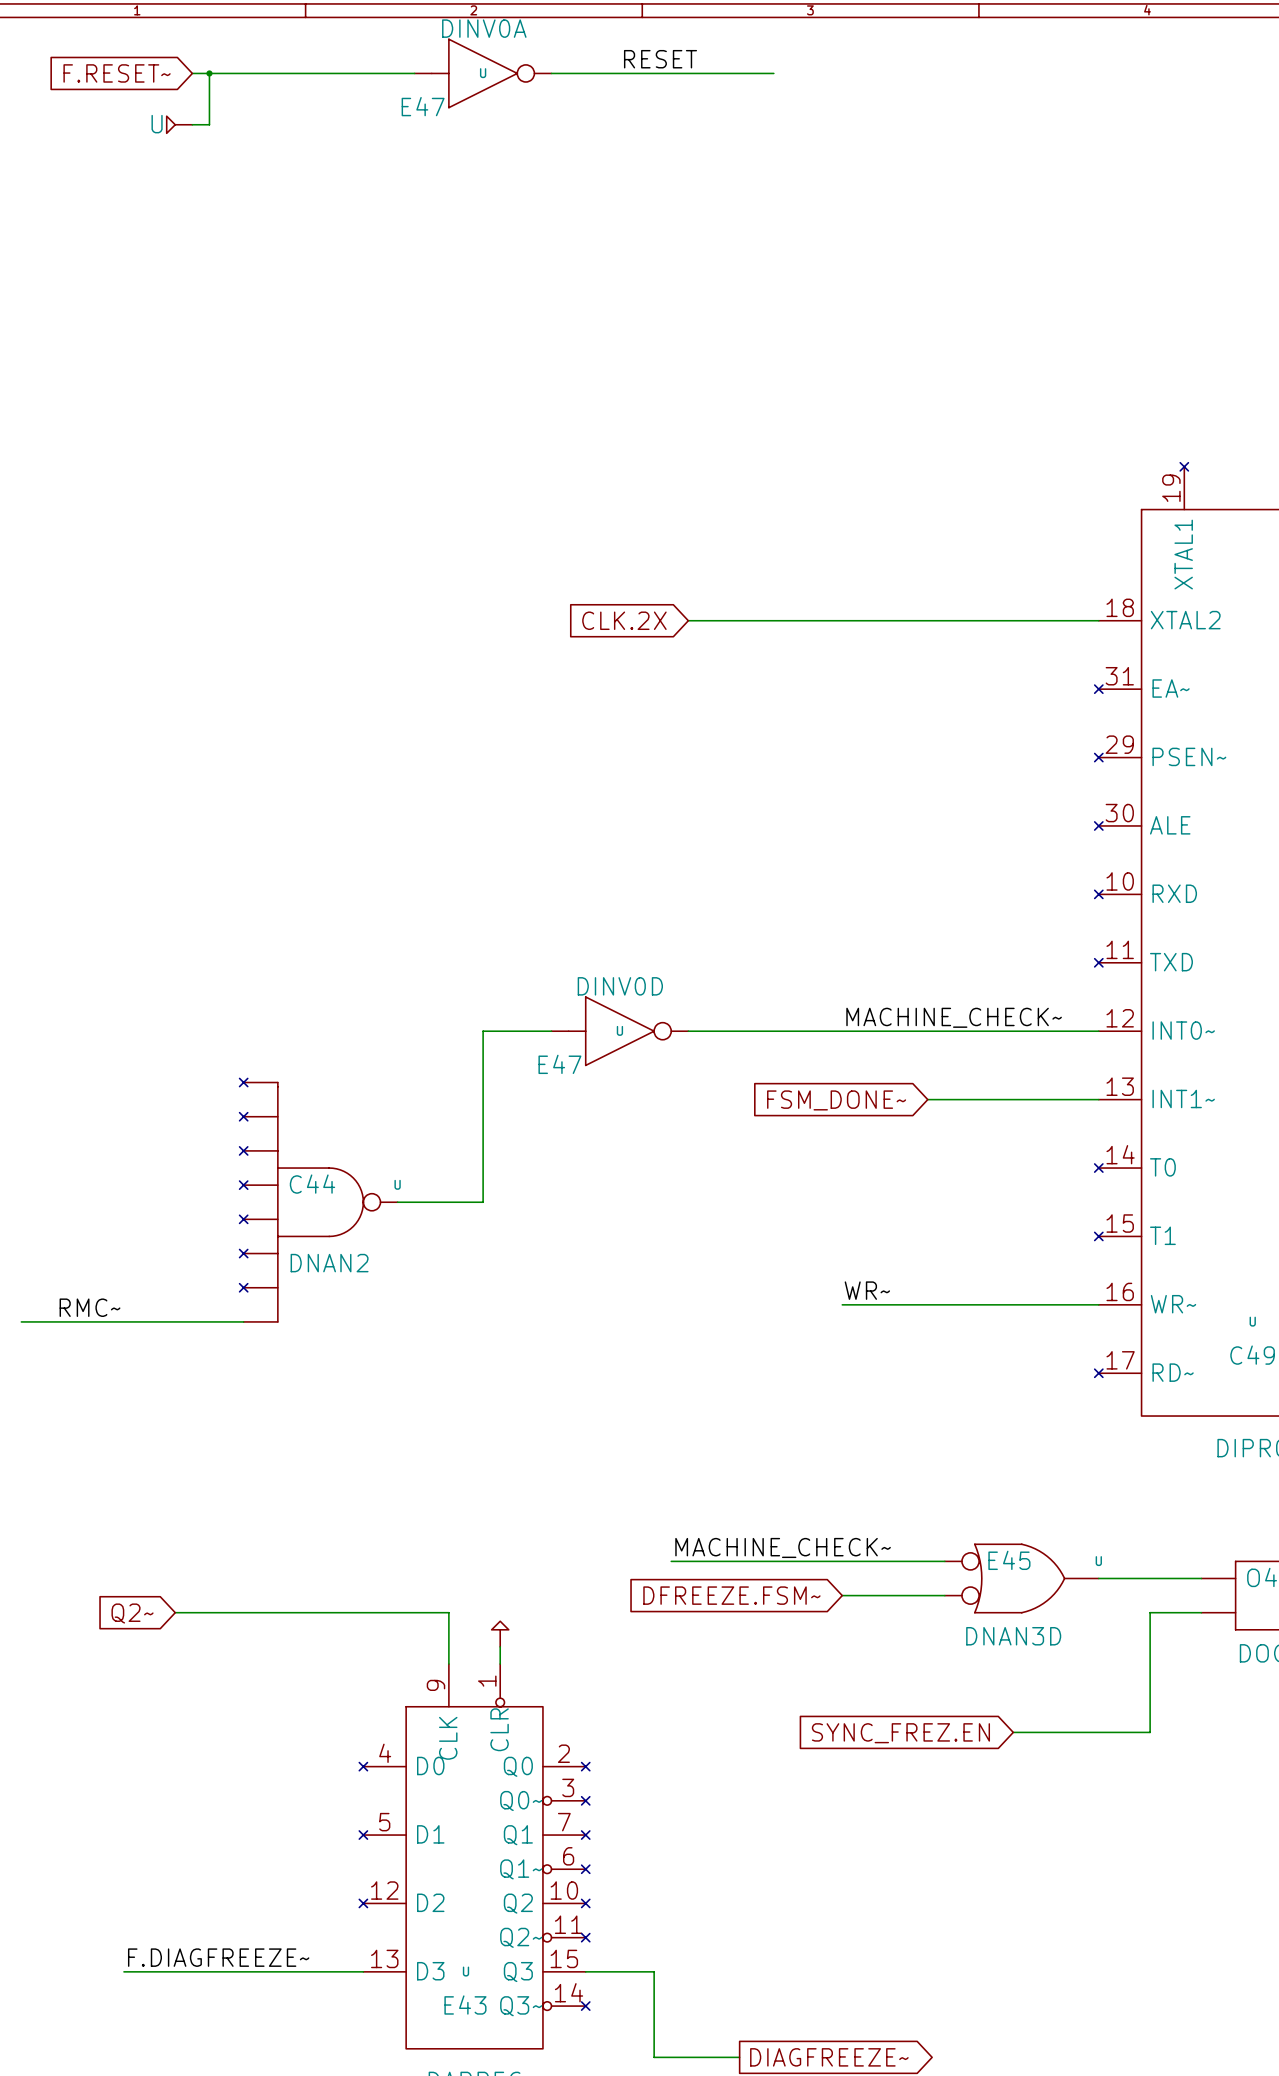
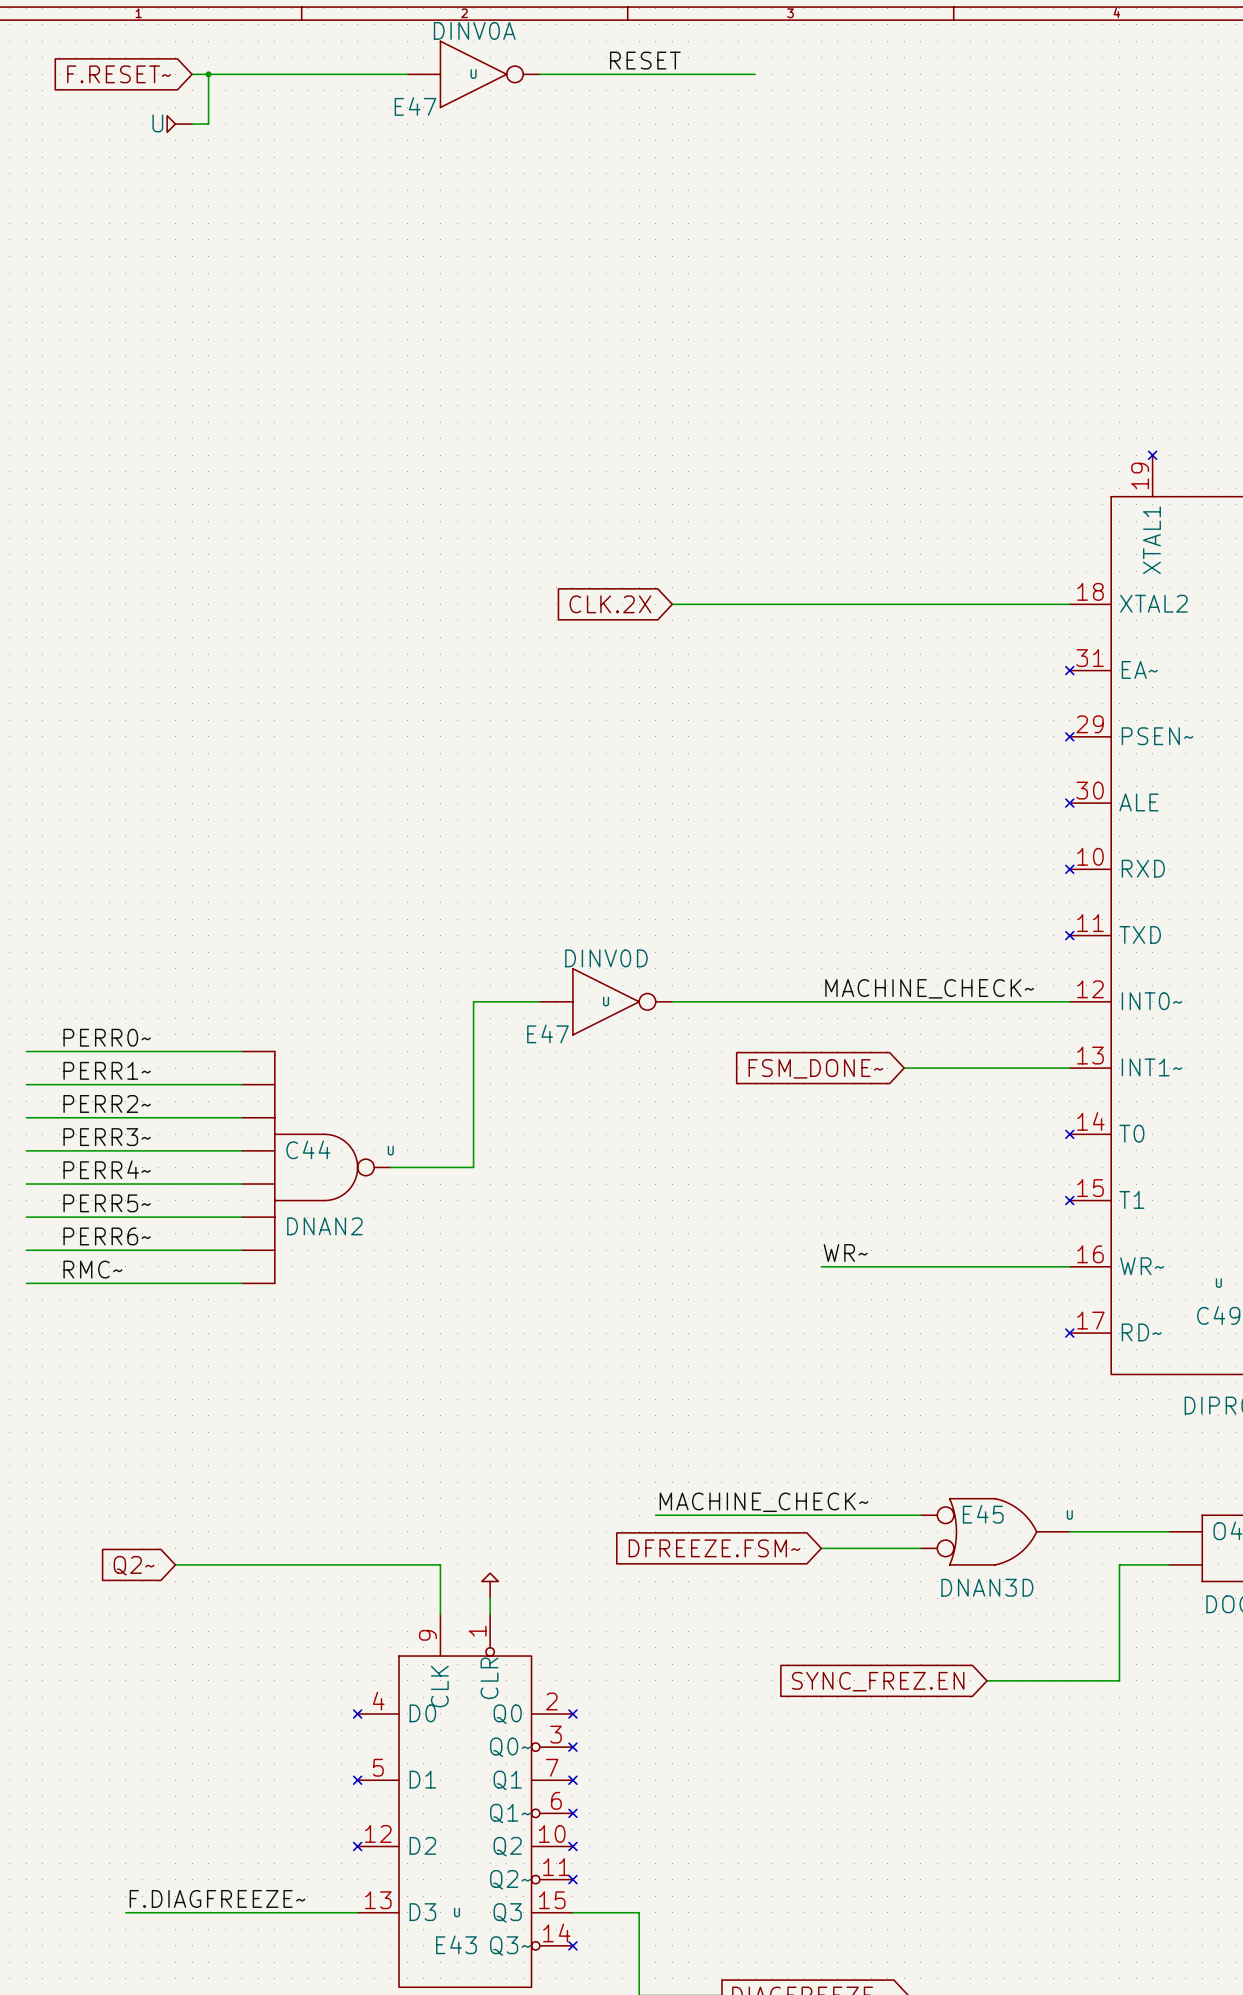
label: none -> PERR0~ (107, 1037)
wire: none -> (26, 1051) (241, 1051)
no-connect mark: (243, 1082) -> none
label: none -> PERR1~ (107, 1070)
wire: none -> (26, 1084) (241, 1084)
no-connect mark: (243, 1116) -> none
label: none -> PERR2~ (107, 1103)
wire: none -> (26, 1117) (241, 1117)
no-connect mark: (243, 1150) -> none
label: none -> PERR3~ (107, 1137)
wire: none -> (26, 1150) (241, 1150)
no-connect mark: (243, 1185) -> none
label: none -> PERR4~ (107, 1169)
wire: none -> (26, 1184) (241, 1184)
no-connect mark: (243, 1219) -> none
label: none -> PERR5~ (107, 1203)
wire: none -> (26, 1217) (241, 1217)
no-connect mark: (243, 1253) -> none
label: none -> PERR6~ (107, 1236)
wire: none -> (26, 1250) (241, 1250)
no-connect mark: (243, 1287) -> none

